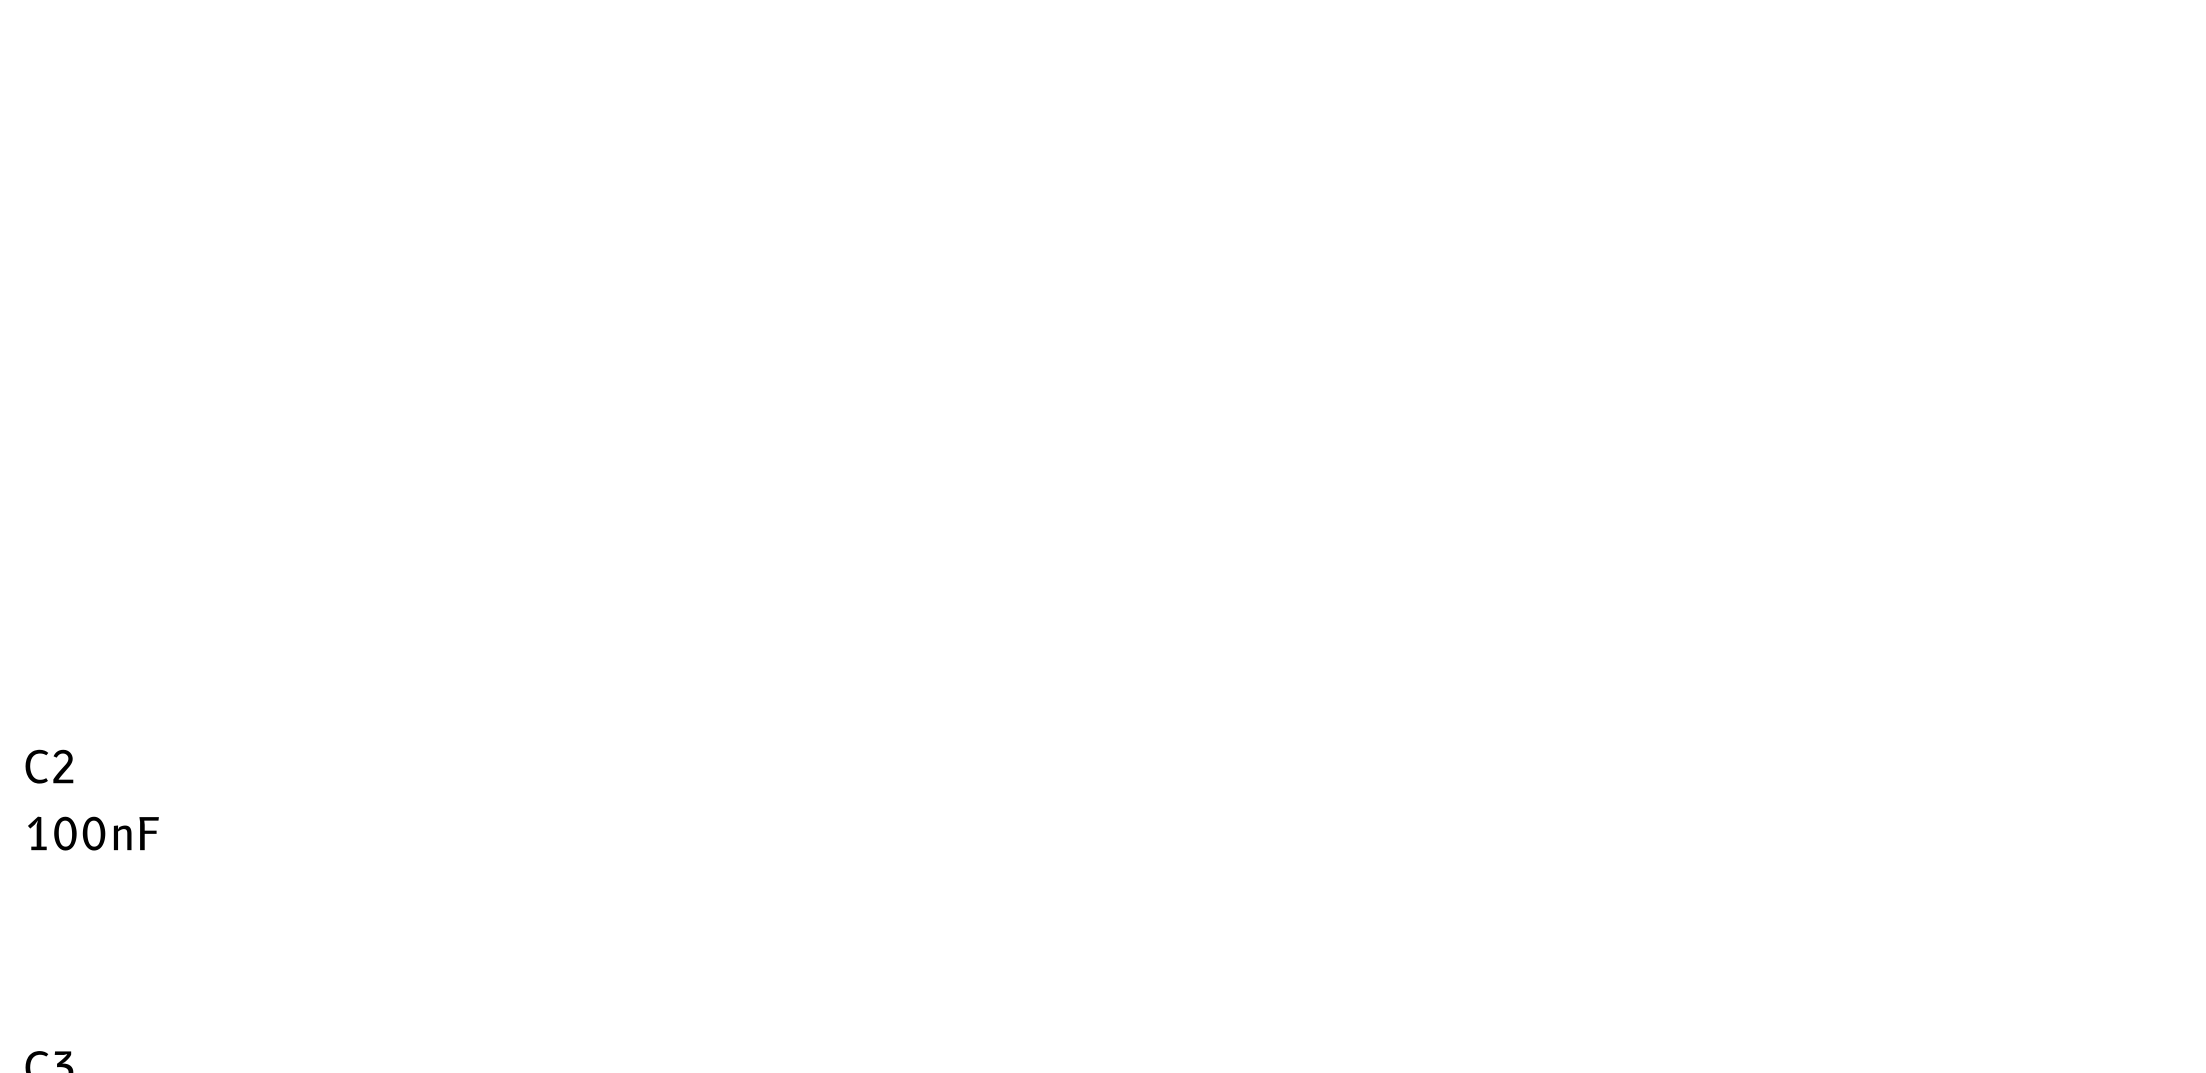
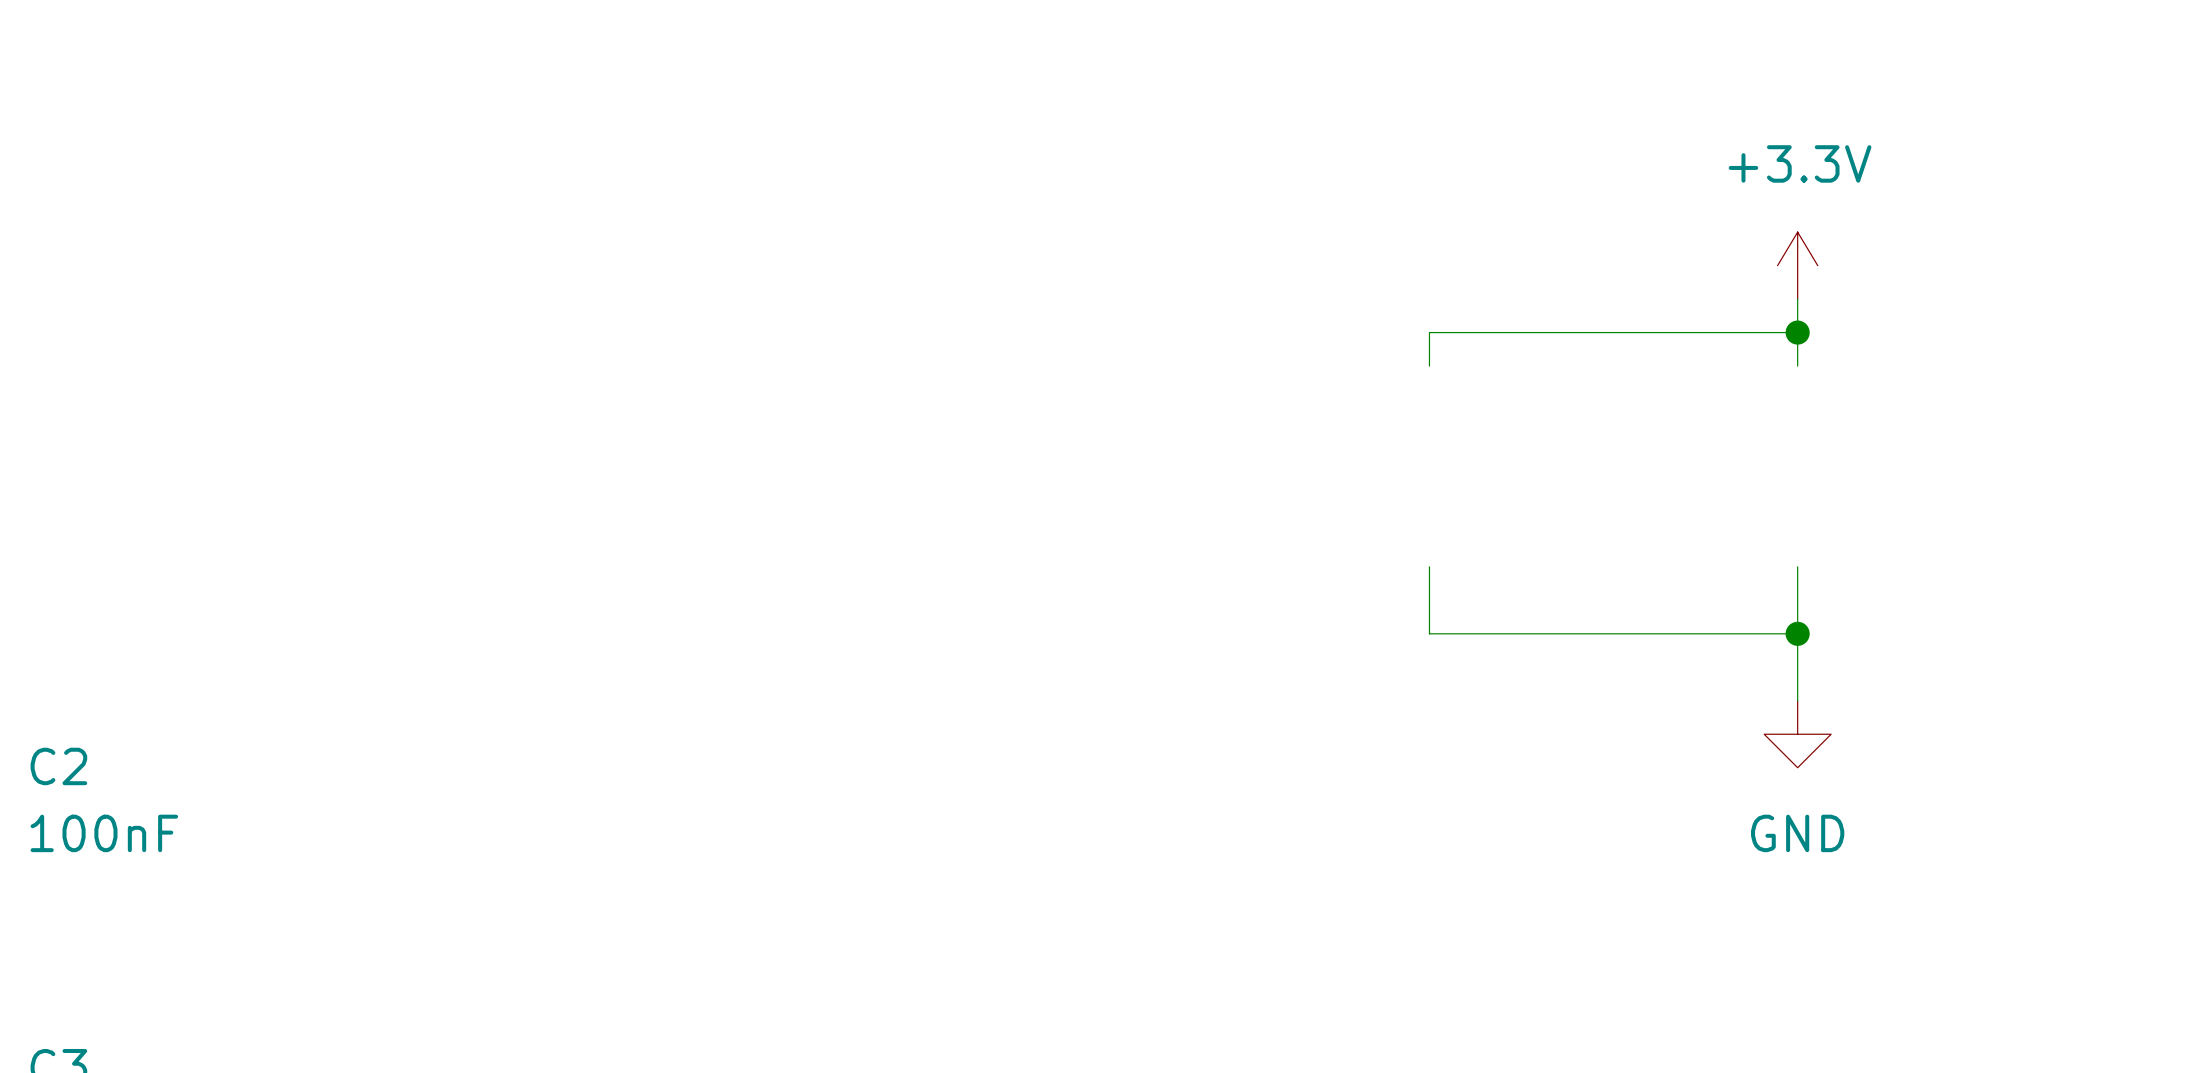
power symbol: none -> +3.3V (1797, 265)
wire: none -> (1797, 299) (1797, 366)
wire: none -> (1797, 332) (1429, 332) (1429, 366)
junction: none -> (1797, 332)
wire: none -> (1429, 566) (1429, 633) (1797, 633)
wire: none -> (1797, 566) (1797, 700)
junction: none -> (1797, 633)
power symbol: none -> GND (1797, 734)

